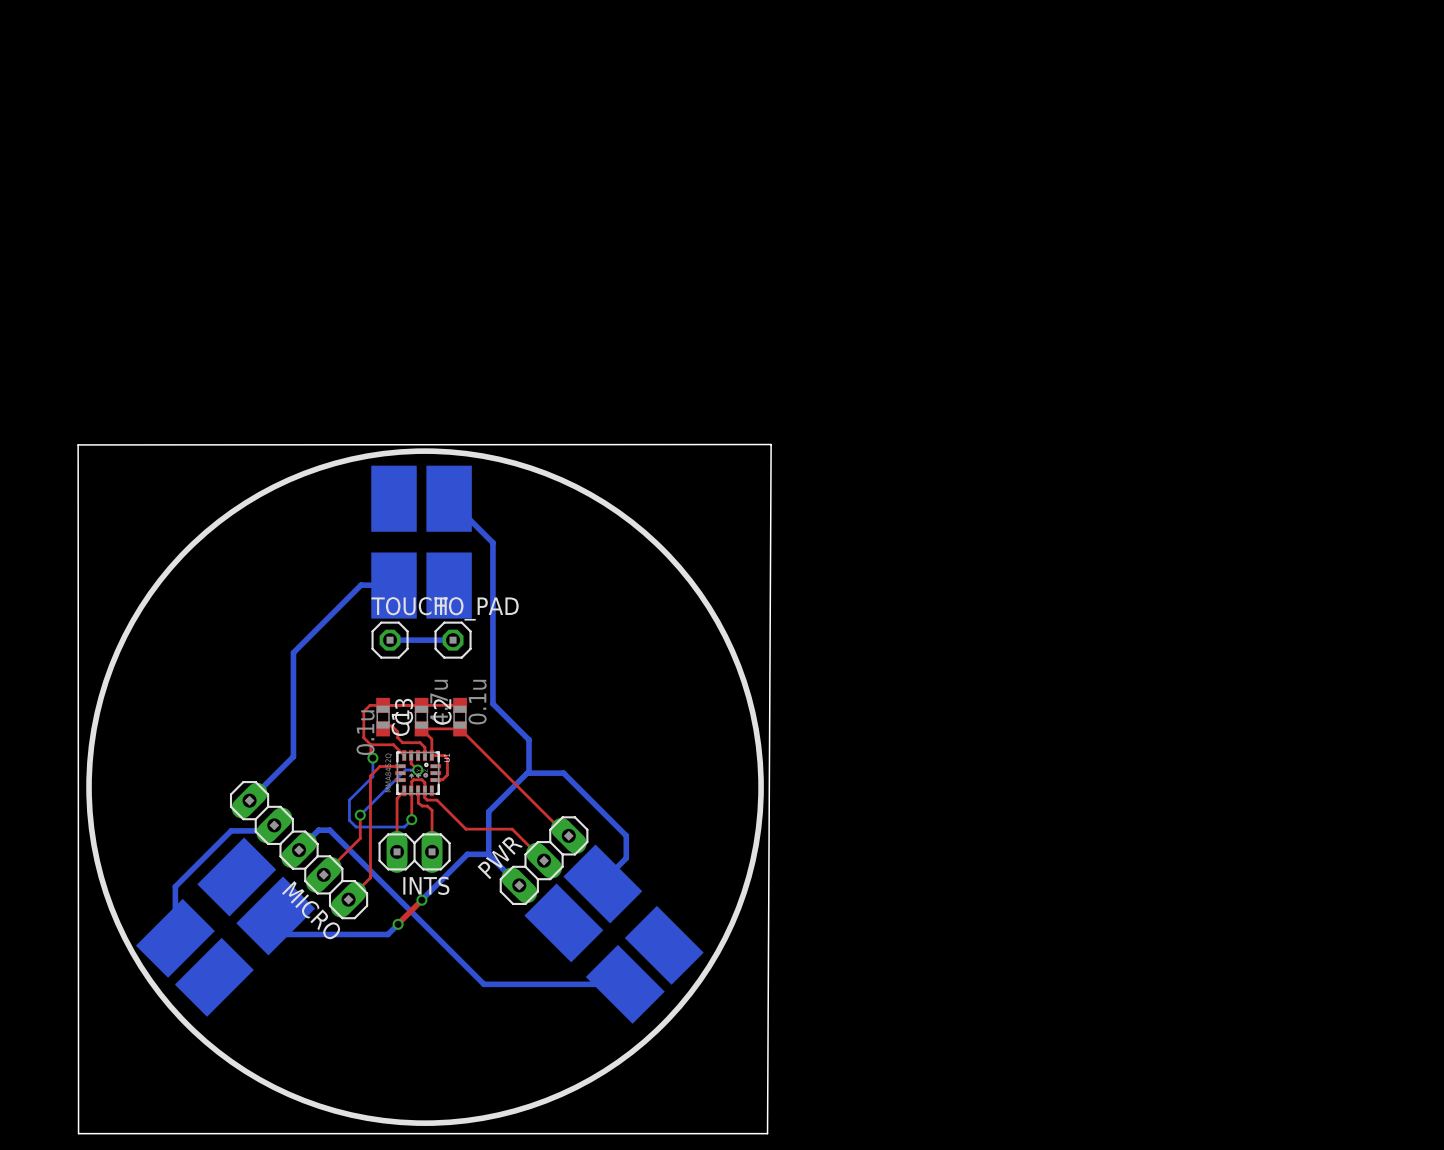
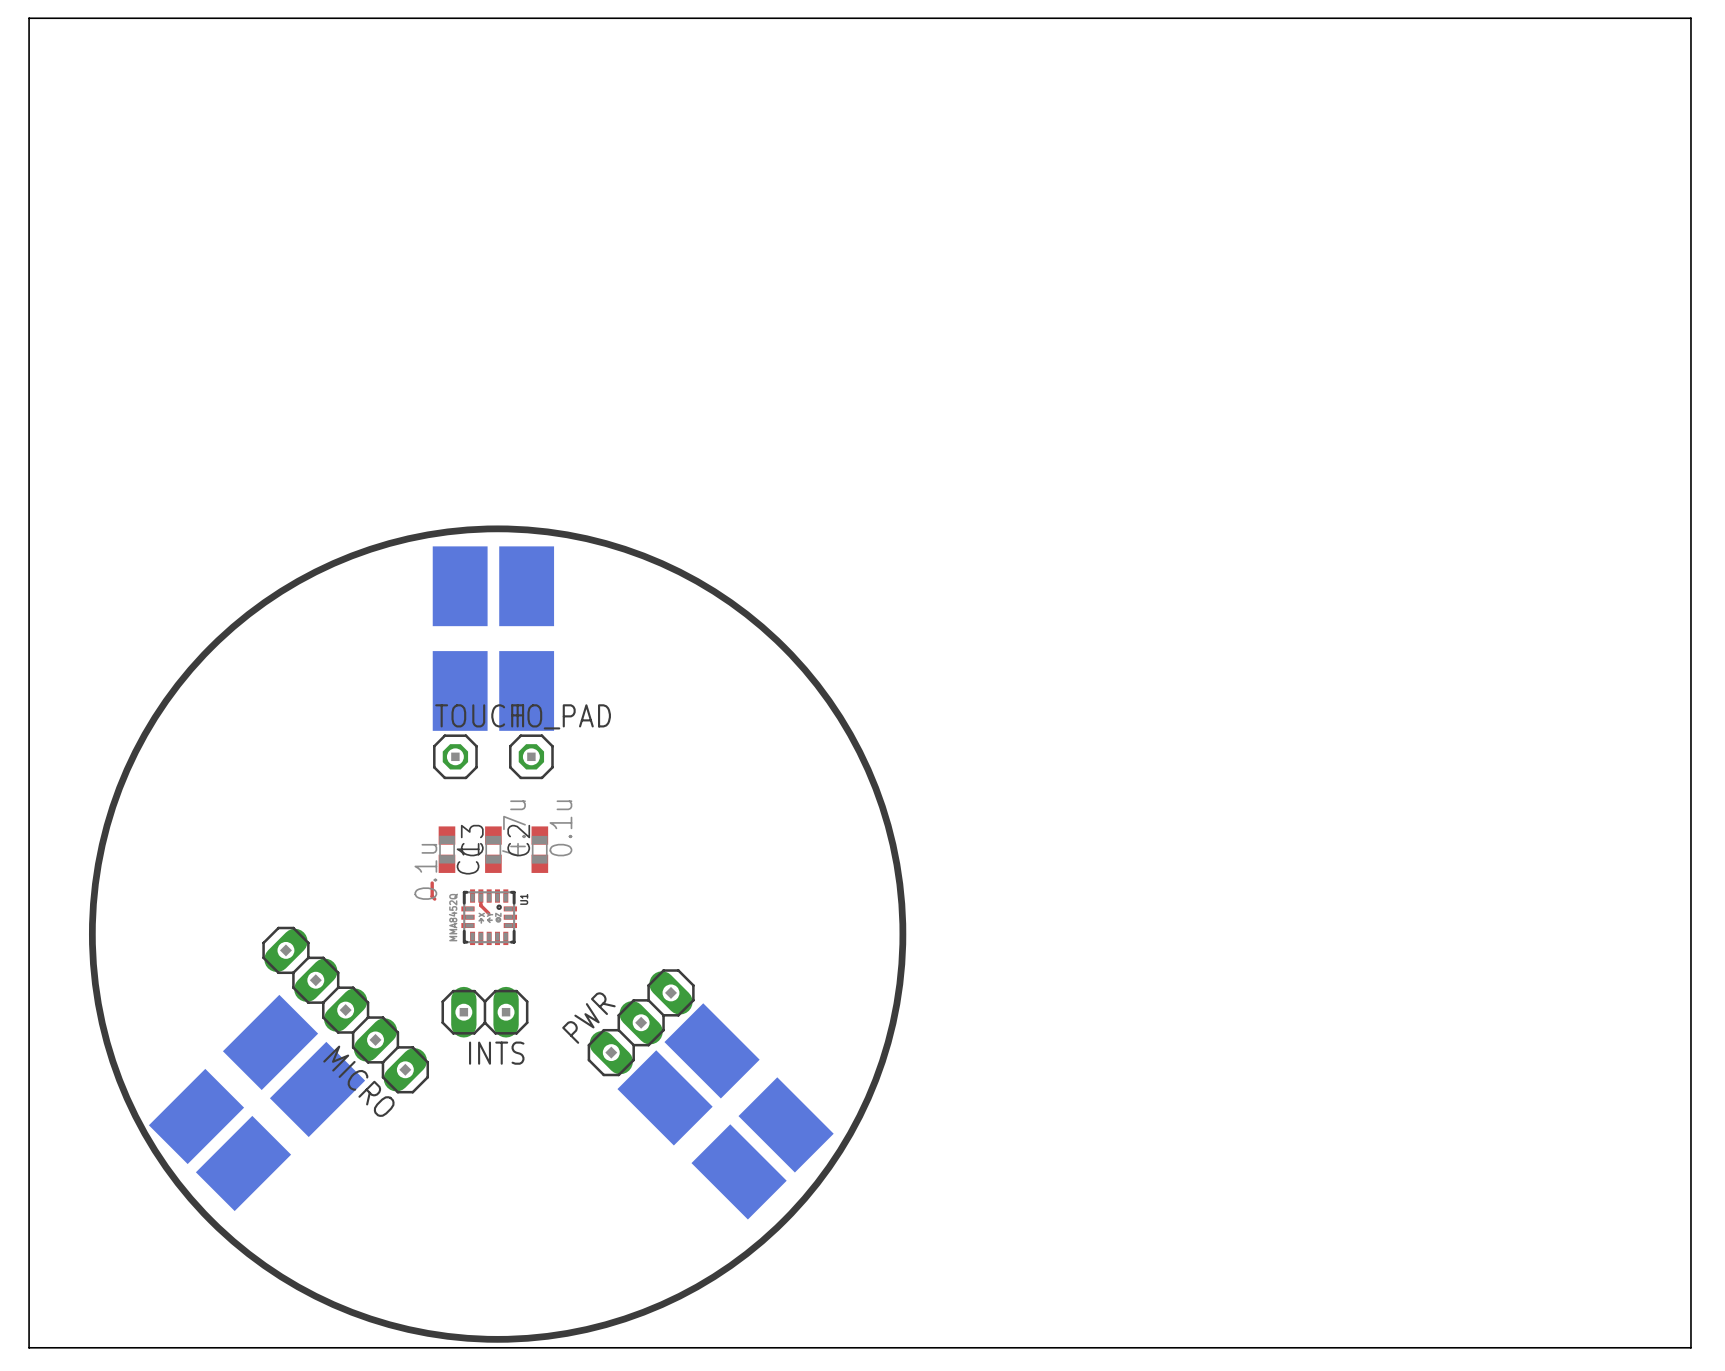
board edge: none -> (29, 18) (1690, 18) (1690, 1347) (29, 1347) (29, 18)
board edge: (771, 444) (767, 1133) (78, 1133) (78, 444) (771, 444) -> none
bottom track: (449, 499) (492, 542) (492, 703) (529, 739) (528, 773) -> none
bottom track: (394, 585) (361, 585) (293, 652) (293, 756) (249, 800) -> none
bottom track: (390, 640) (453, 640) -> none
top track: (460, 705) (369, 705) (363, 711) (363, 737) (370, 744) (393, 744) (404, 755) -> none
top track: (383, 728) (386, 725) (391, 725) (397, 731) (397, 737) (402, 742) (420, 742) (424, 747) (424, 755) -> none
bottom track: (372, 758) (372, 776) (349, 800) (349, 820) (356, 827) (404, 827) (411, 819) -> none
via: (372, 758) -> none
top track: (400, 766) (379, 766) (370, 775) (370, 877) (348, 899) -> none
bottom track: (417, 769) (405, 769) (360, 815) -> none
via: (417, 769) -> none
top track: (435, 780) (442, 779) (447, 774) (447, 758) (444, 755) (431, 755) (431, 739) (421, 728) (460, 728) (568, 835) -> none
top track: (404, 790) (397, 798) (397, 851) -> none
top track: (418, 790) (418, 803) (427, 806) (432, 810) (432, 851) -> none
top track: (360, 815) (360, 838) (323, 874) -> none
via: (360, 815) -> none
top track: (411, 819) (411, 781) (421, 779) (424, 782) (424, 797) (427, 800) (436, 800) (466, 829) (512, 829) (544, 860) -> none
via: (411, 819) -> none
bottom track: (274, 825) (268, 830) (231, 830) (175, 886) (175, 938) -> none
bottom track: (299, 850) (318, 830) (329, 830) (483, 984) (625, 984) -> none
bottom track: (488, 854) (488, 811) (527, 773) (563, 773) (626, 835) (626, 858) (602, 881) (602, 883) -> none
bottom track: (519, 885) (488, 854) (467, 854) (421, 900) -> none
top track: (421, 900) (398, 924) -> none
via: (421, 900) -> none
bottom track: (275, 915) (276, 934) (387, 934) (398, 924) -> none
via: (398, 924) -> none

